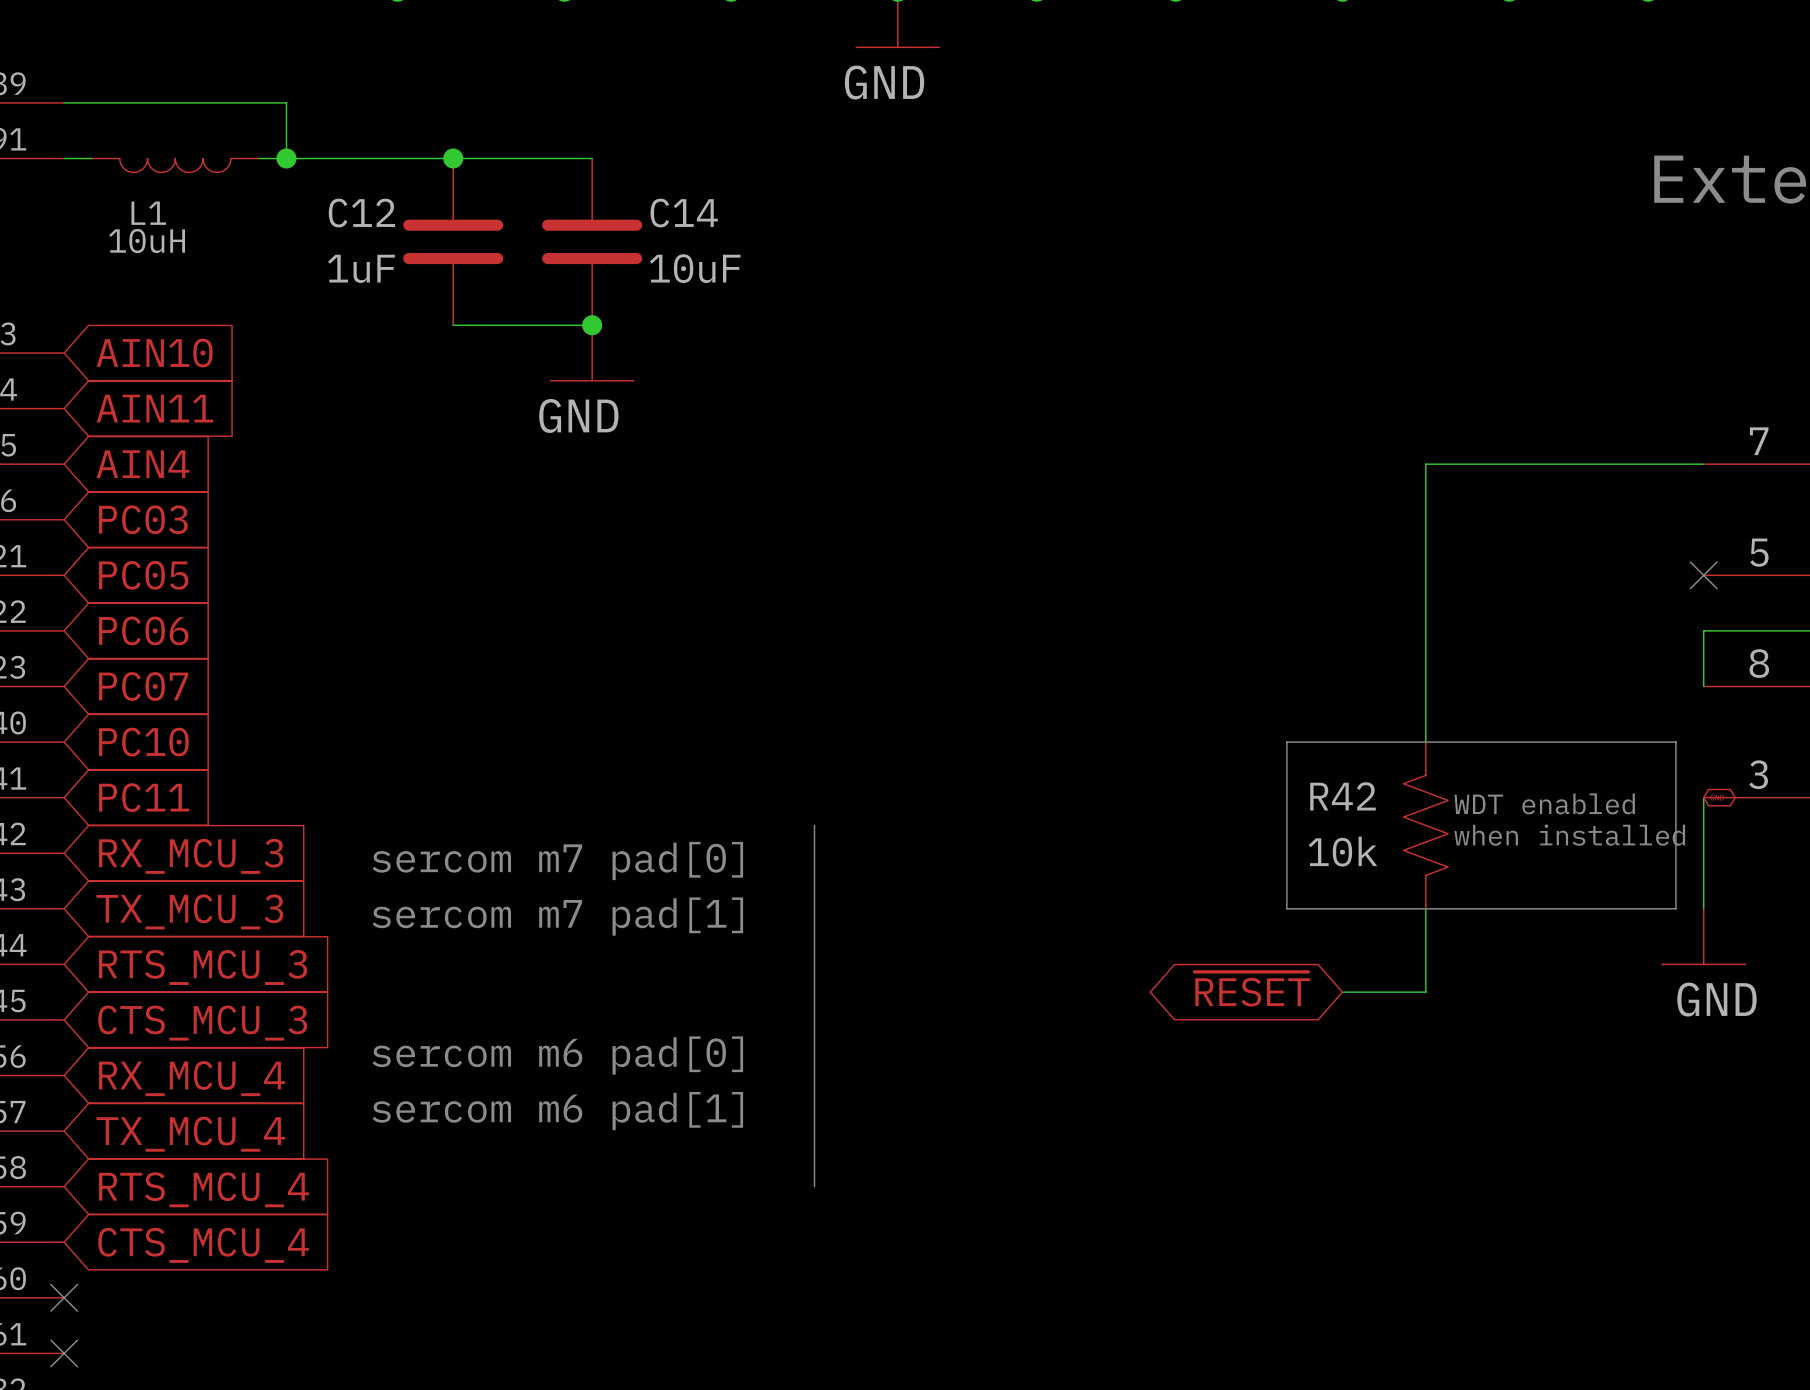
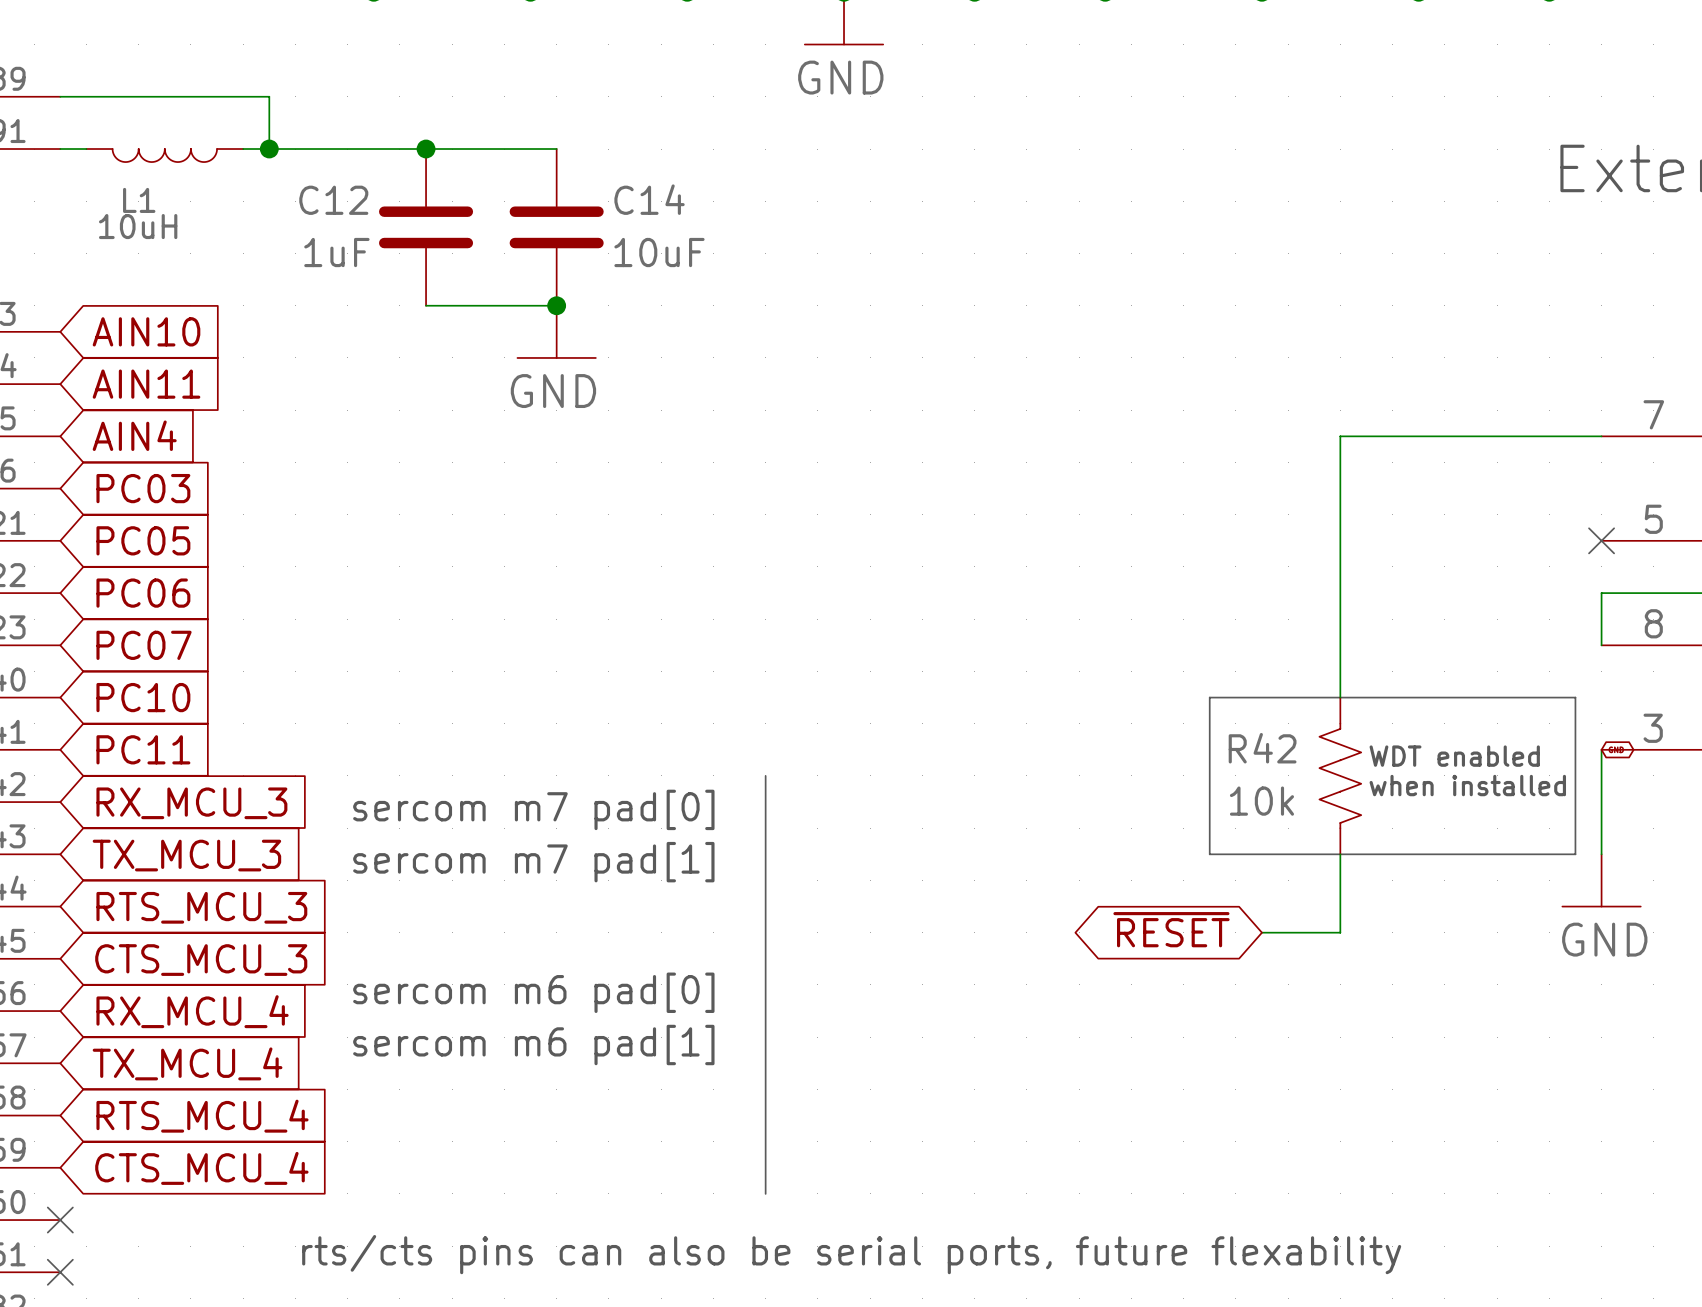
line: none -> (765, 1115) (765, 1193)
text: none -> rts/cts pins can also be serial ports, future flexability (851, 1254)

